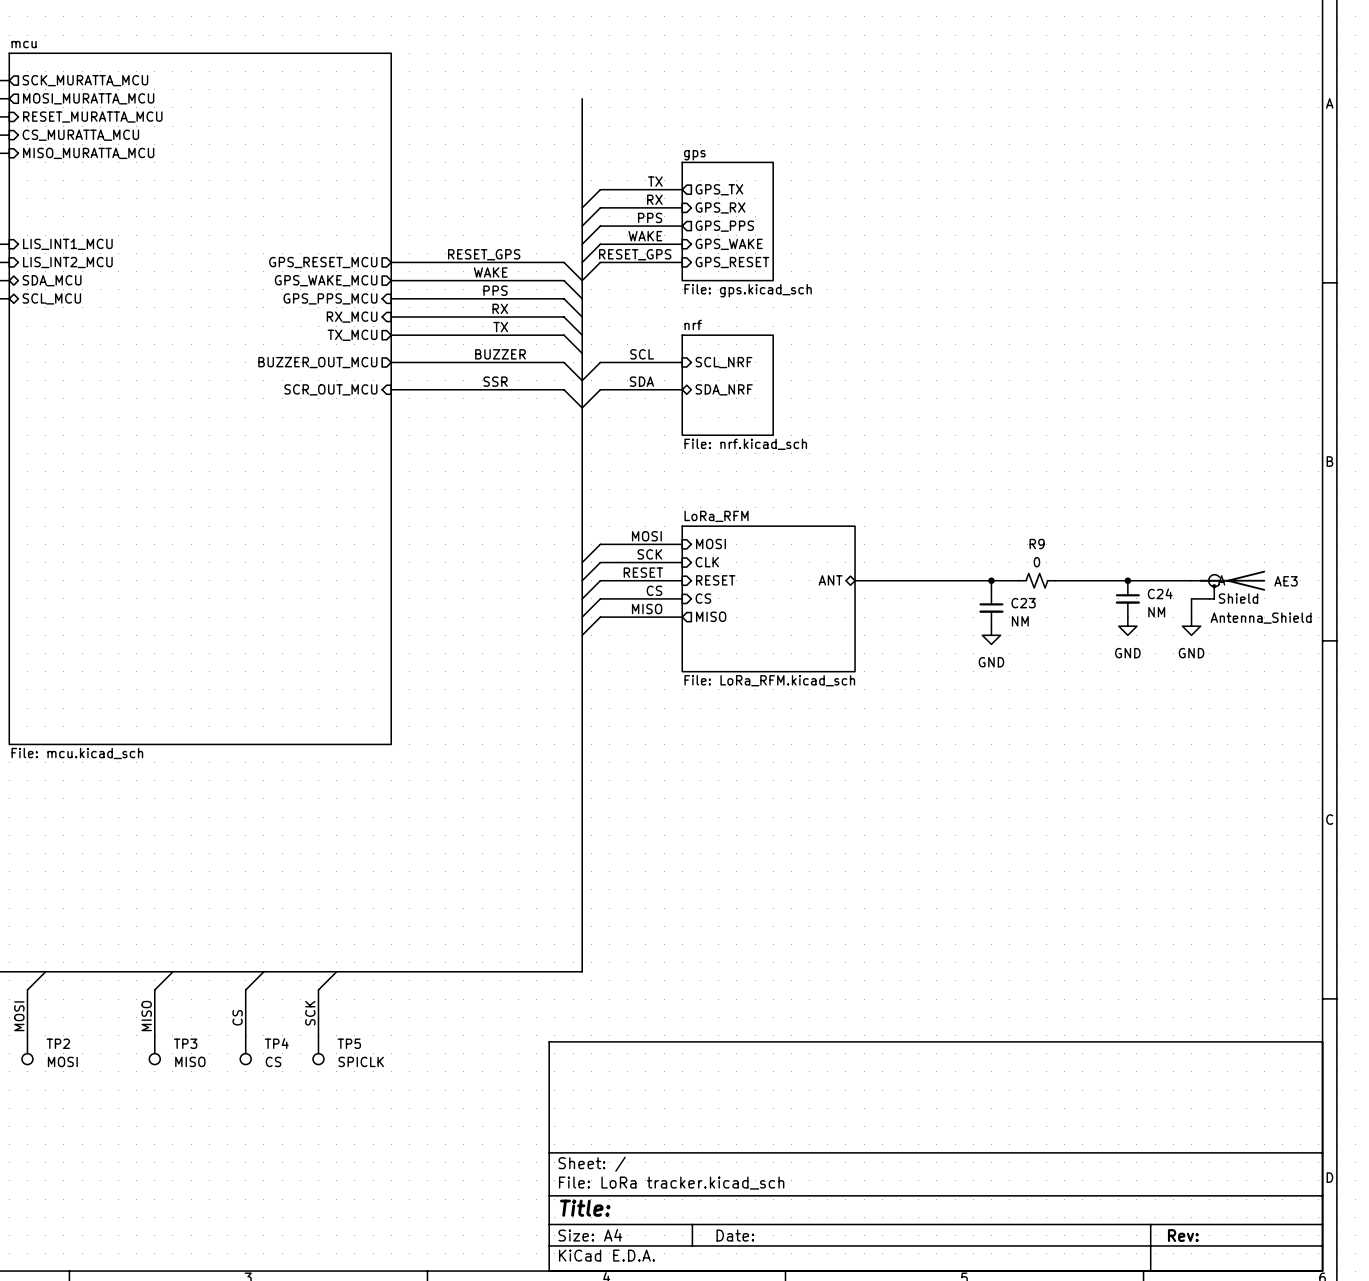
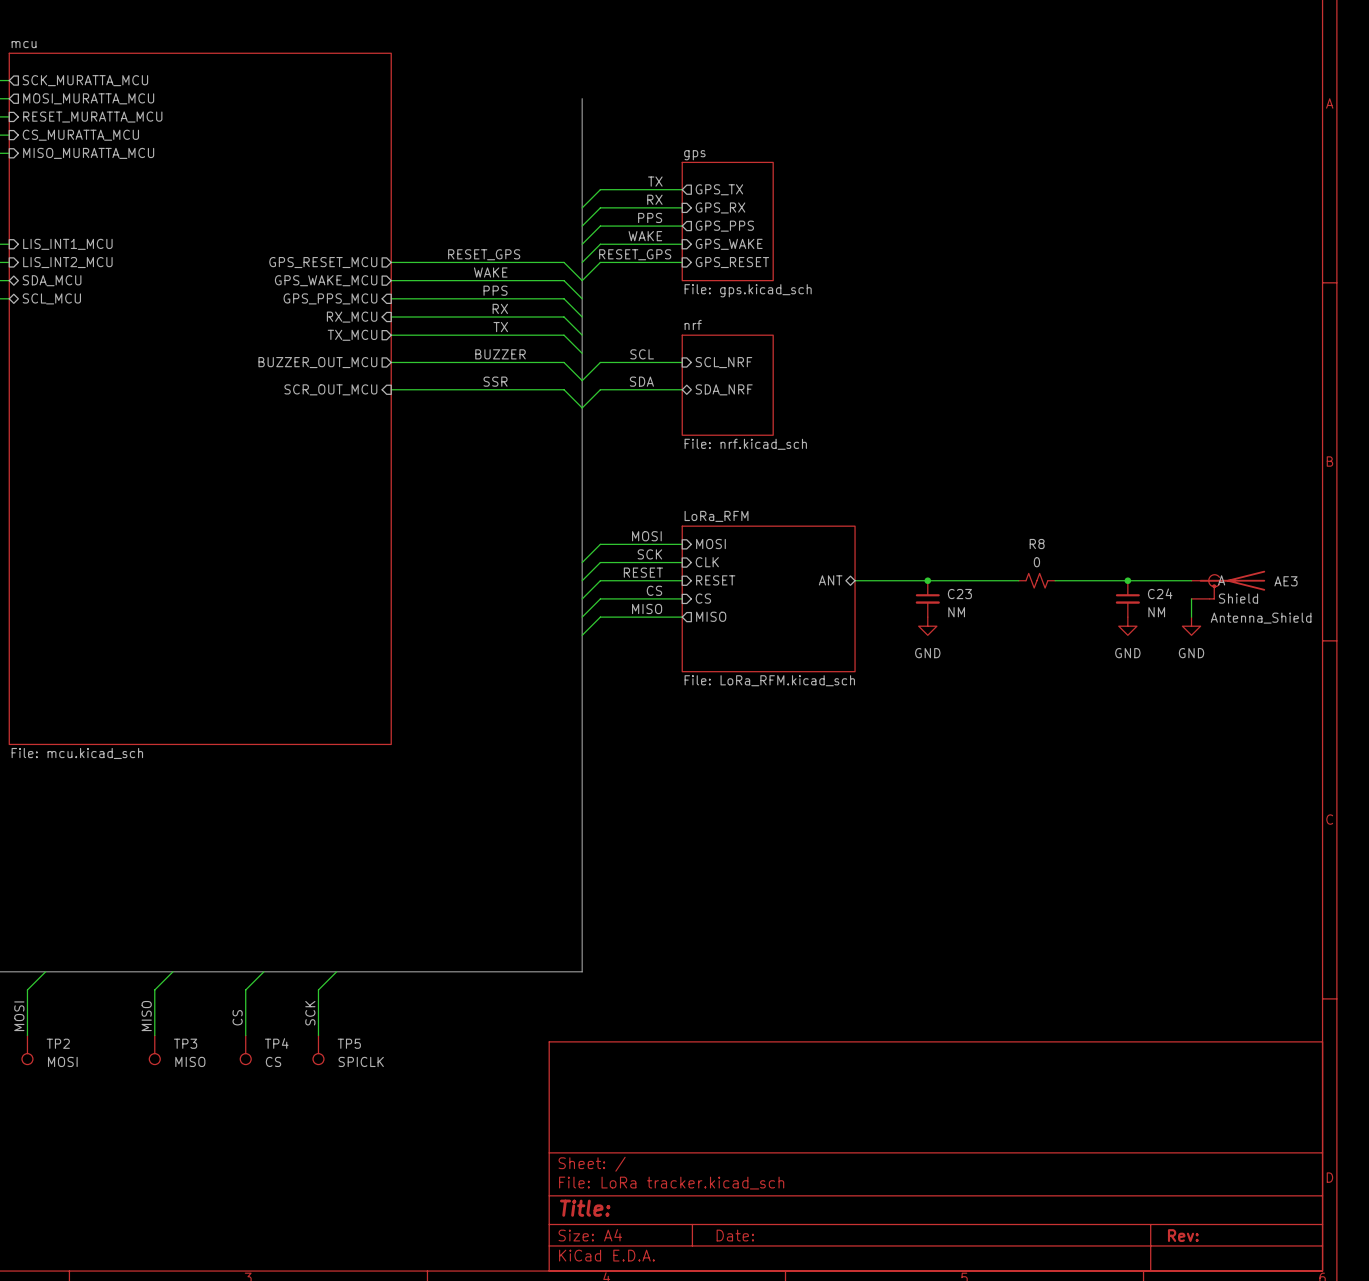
R9 name: R9 (1037, 544) -> R8 (1037, 544)
junction: none -> (927, 580)
wire: (991, 580) (991, 589) -> none
junction: (991, 580) -> none
C23 position: (991, 608) -> (927, 598)
power symbol position: GND (991, 635) -> GND (927, 626)

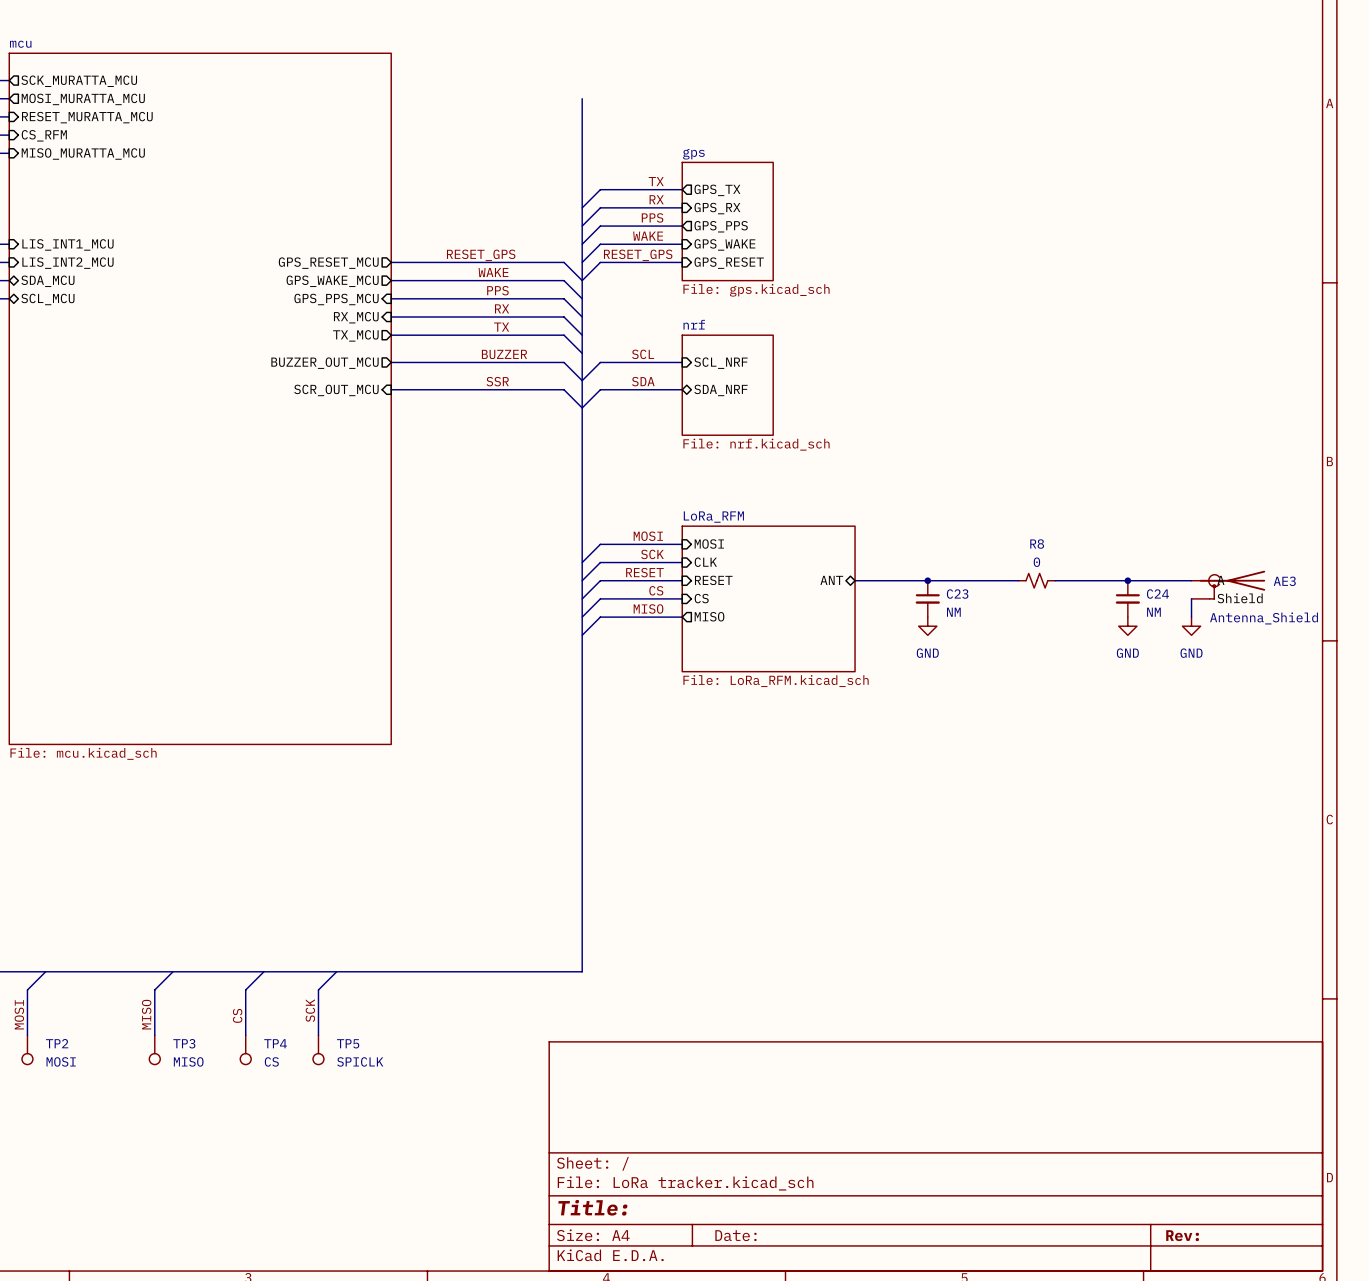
sheet pin: CS_MURATTA_MCU (80, 135) -> CS_RFM (44, 135)

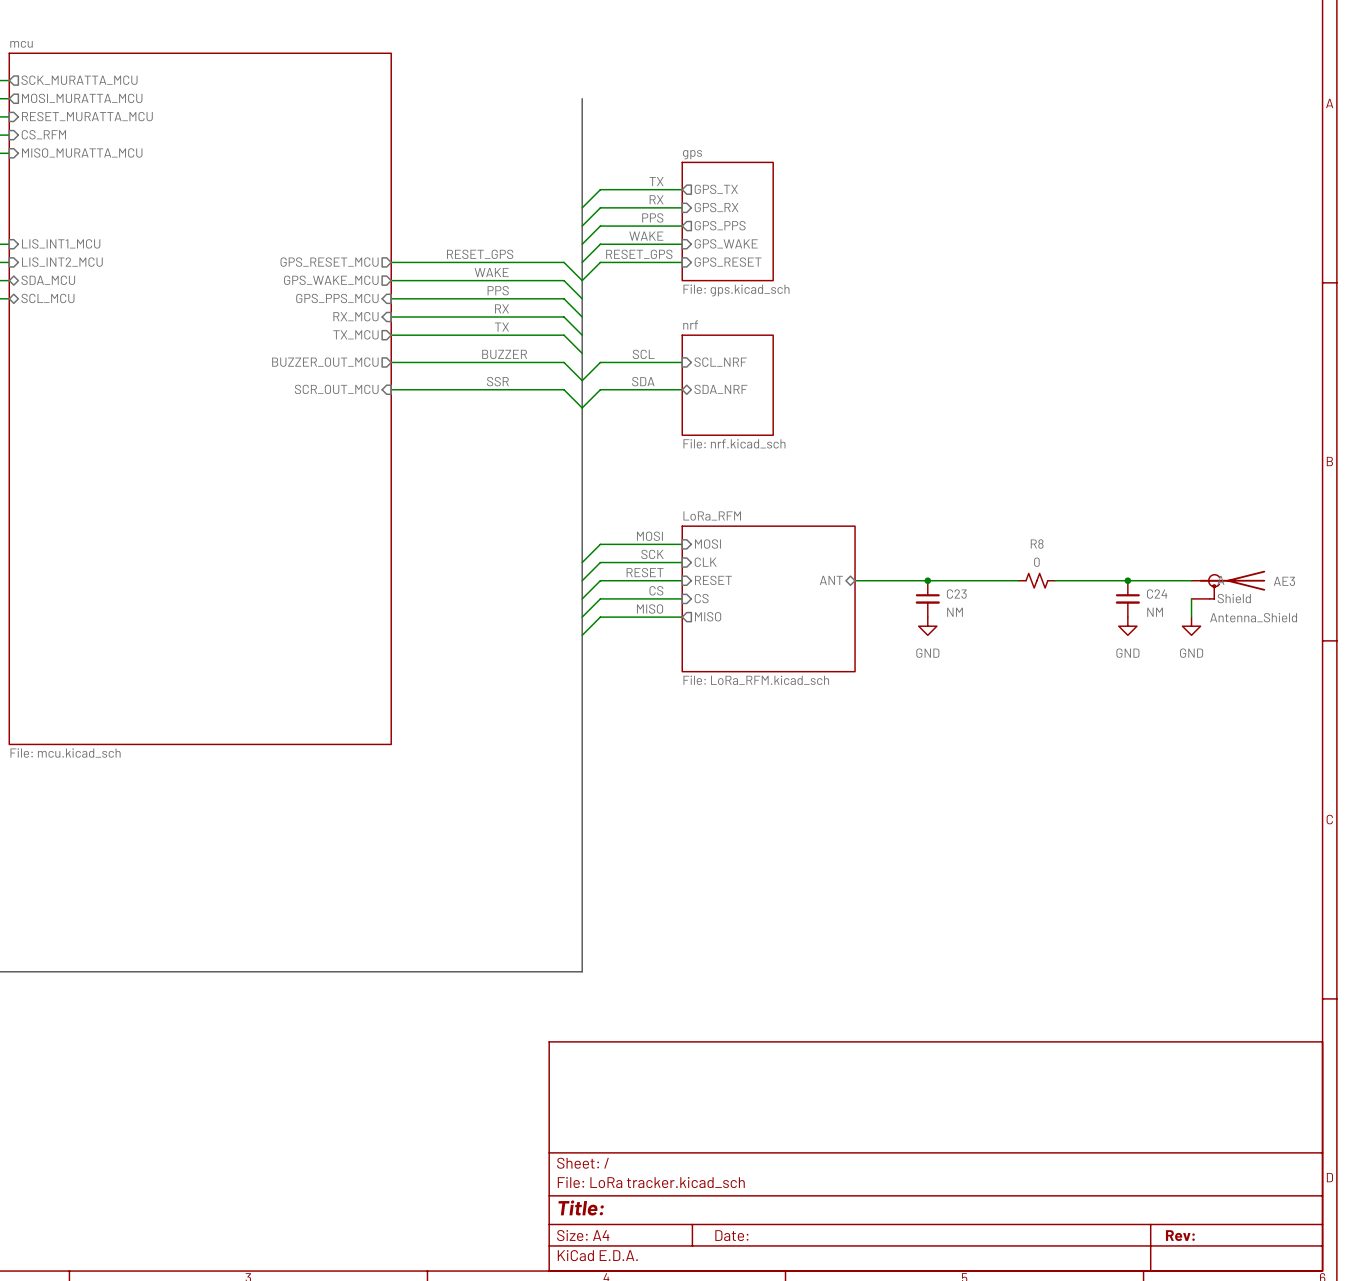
wire: (45, 971) (27, 989) (27, 1035) -> none
wire: (172, 971) (154, 989) (154, 1035) -> none
wire: (263, 971) (245, 989) (245, 1035) -> none
wire: (336, 971) (318, 989) (318, 1035) -> none
label: SCK (310, 1010) -> none
label: MOSI (19, 1014) -> none
label: MISO (146, 1014) -> none
label: CS (237, 1015) -> none
TP2: MOSI (27, 1049) -> none
TP3: MISO (154, 1049) -> none
TP4: CS (245, 1049) -> none
TP5: SPICLK (318, 1049) -> none

